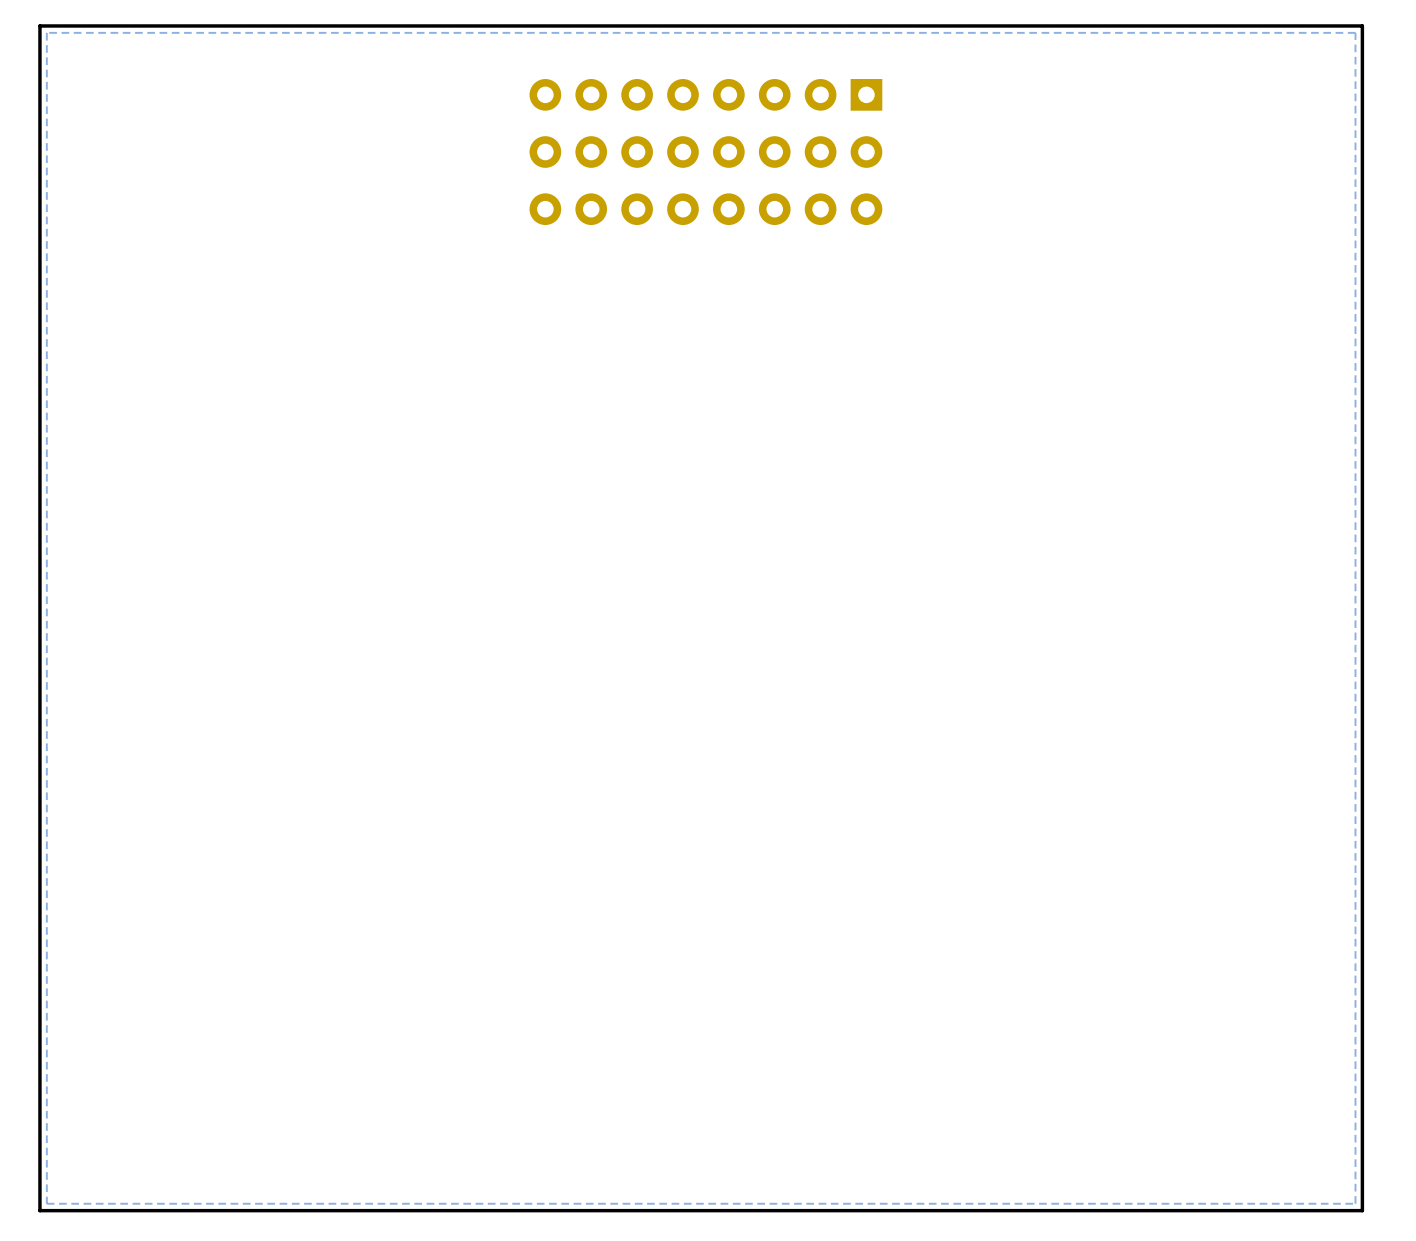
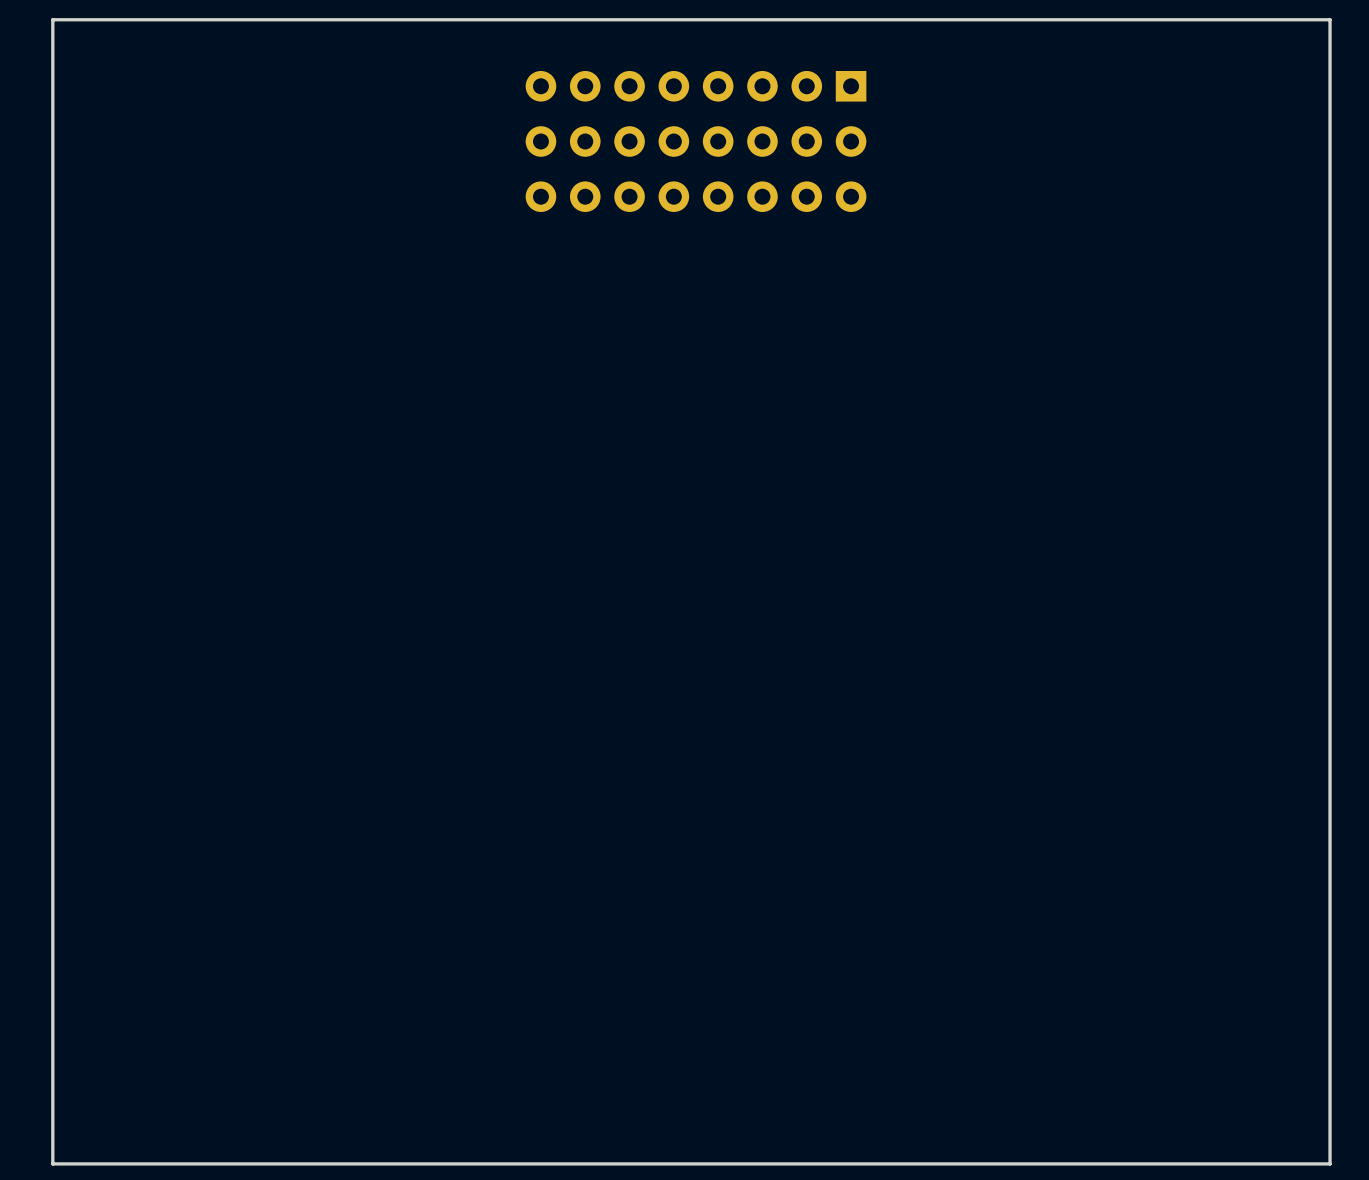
zone outline: (1355, 32) (46, 32) (46, 1203) (1355, 1203) (1355, 32) -> none

